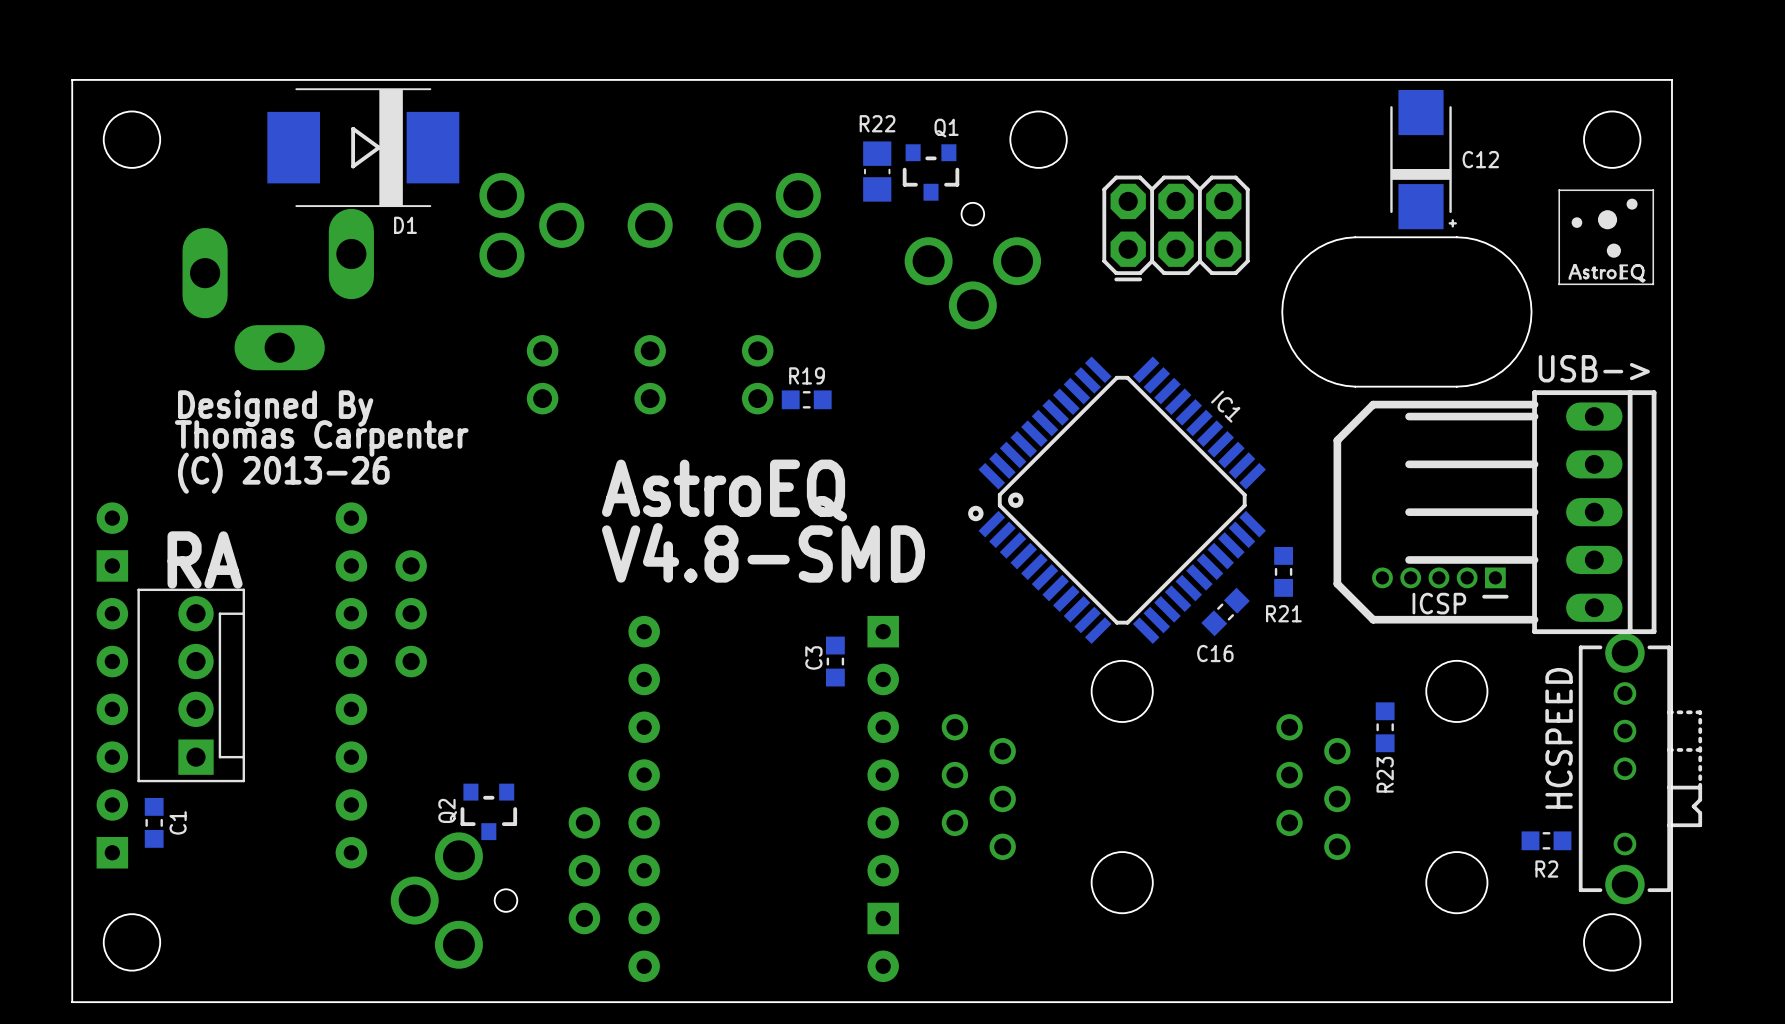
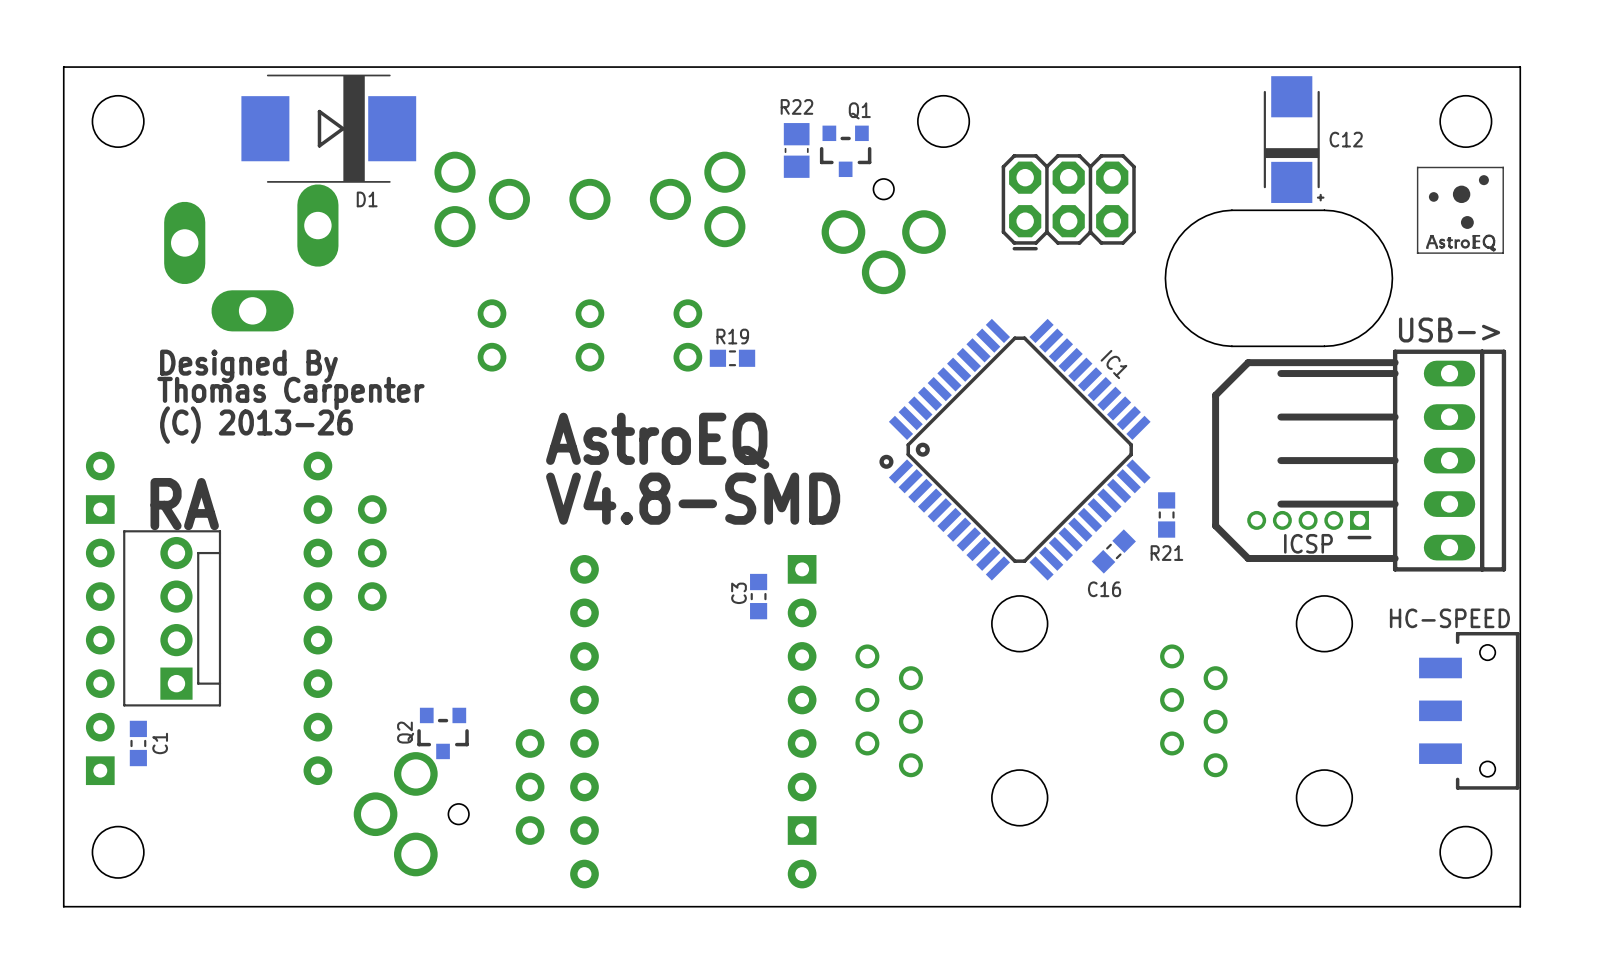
R23: (1385, 727) -> none
HCSPEED: (1640, 768) -> none
HC-SPEED: none -> (1469, 710)
R2: (1546, 840) -> none

